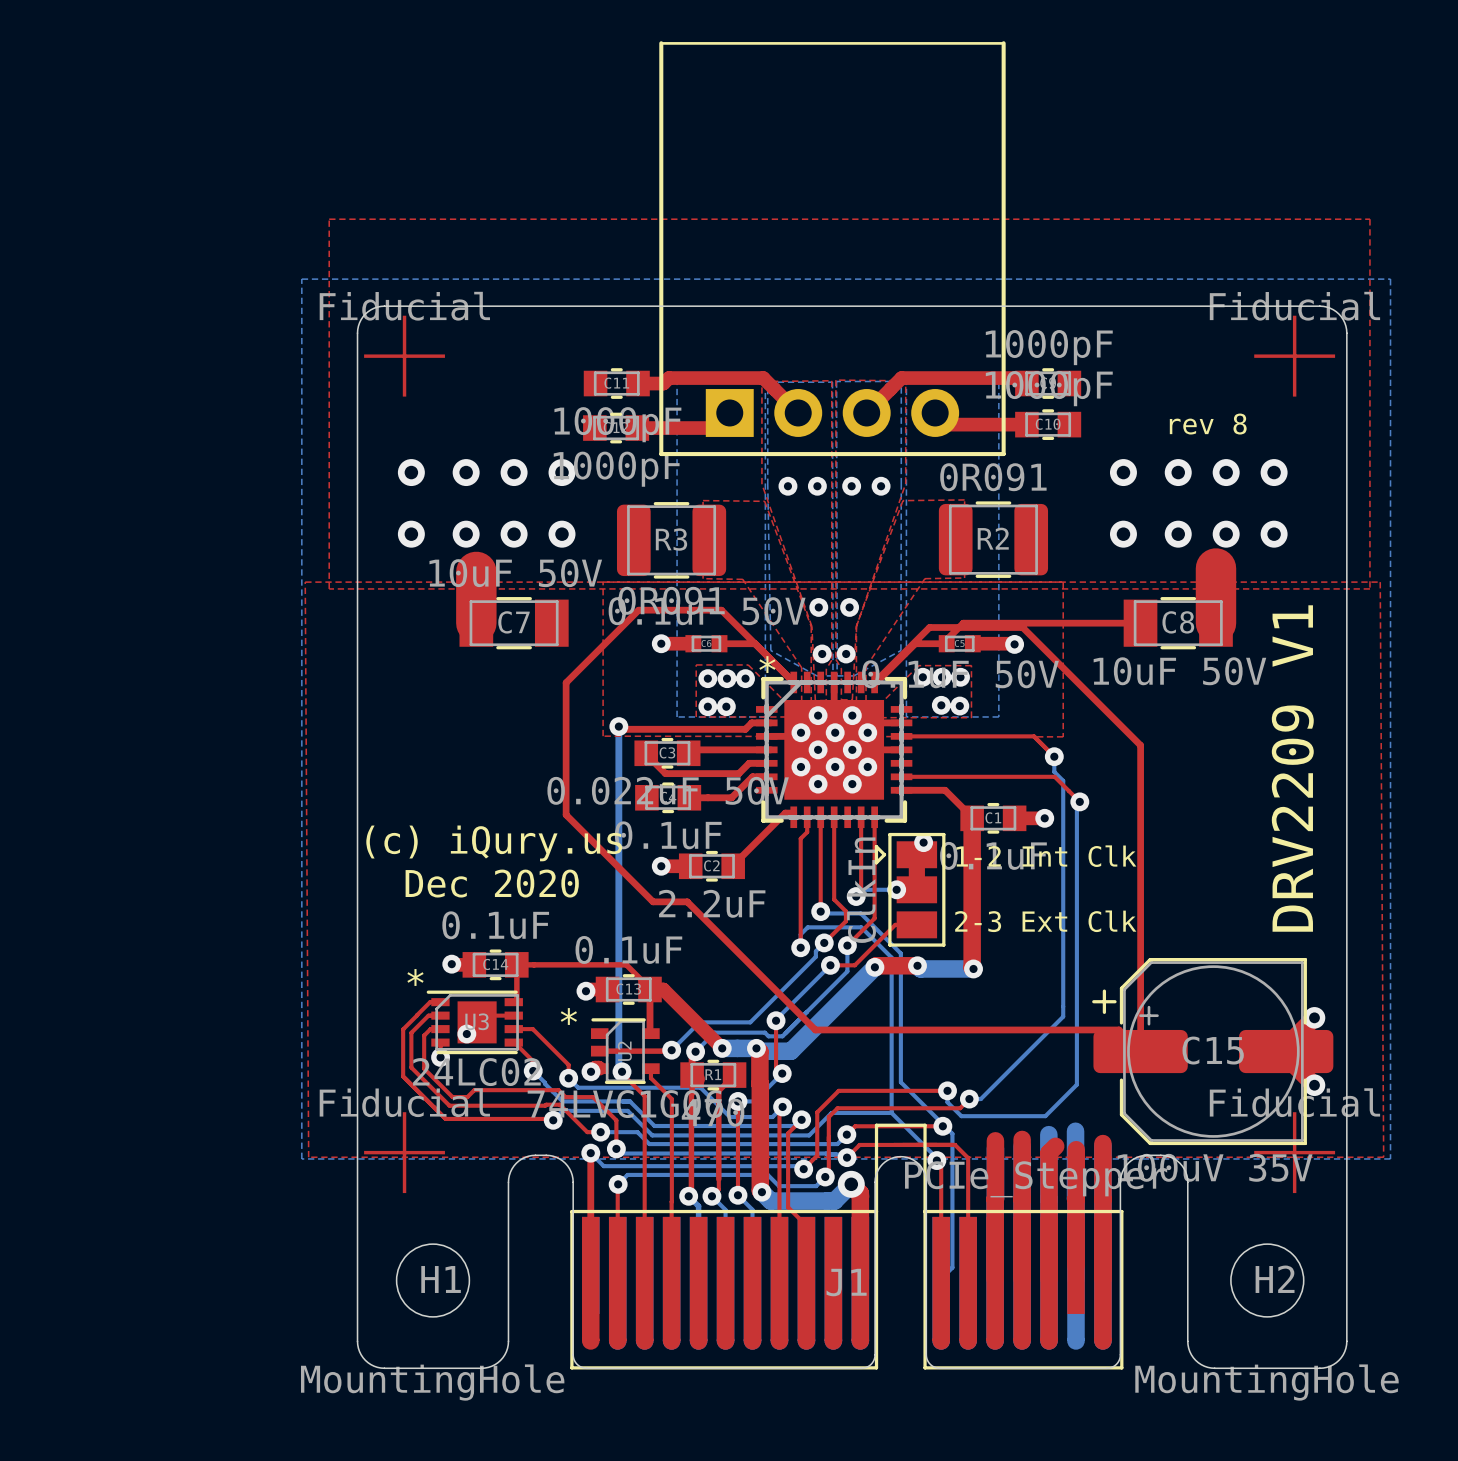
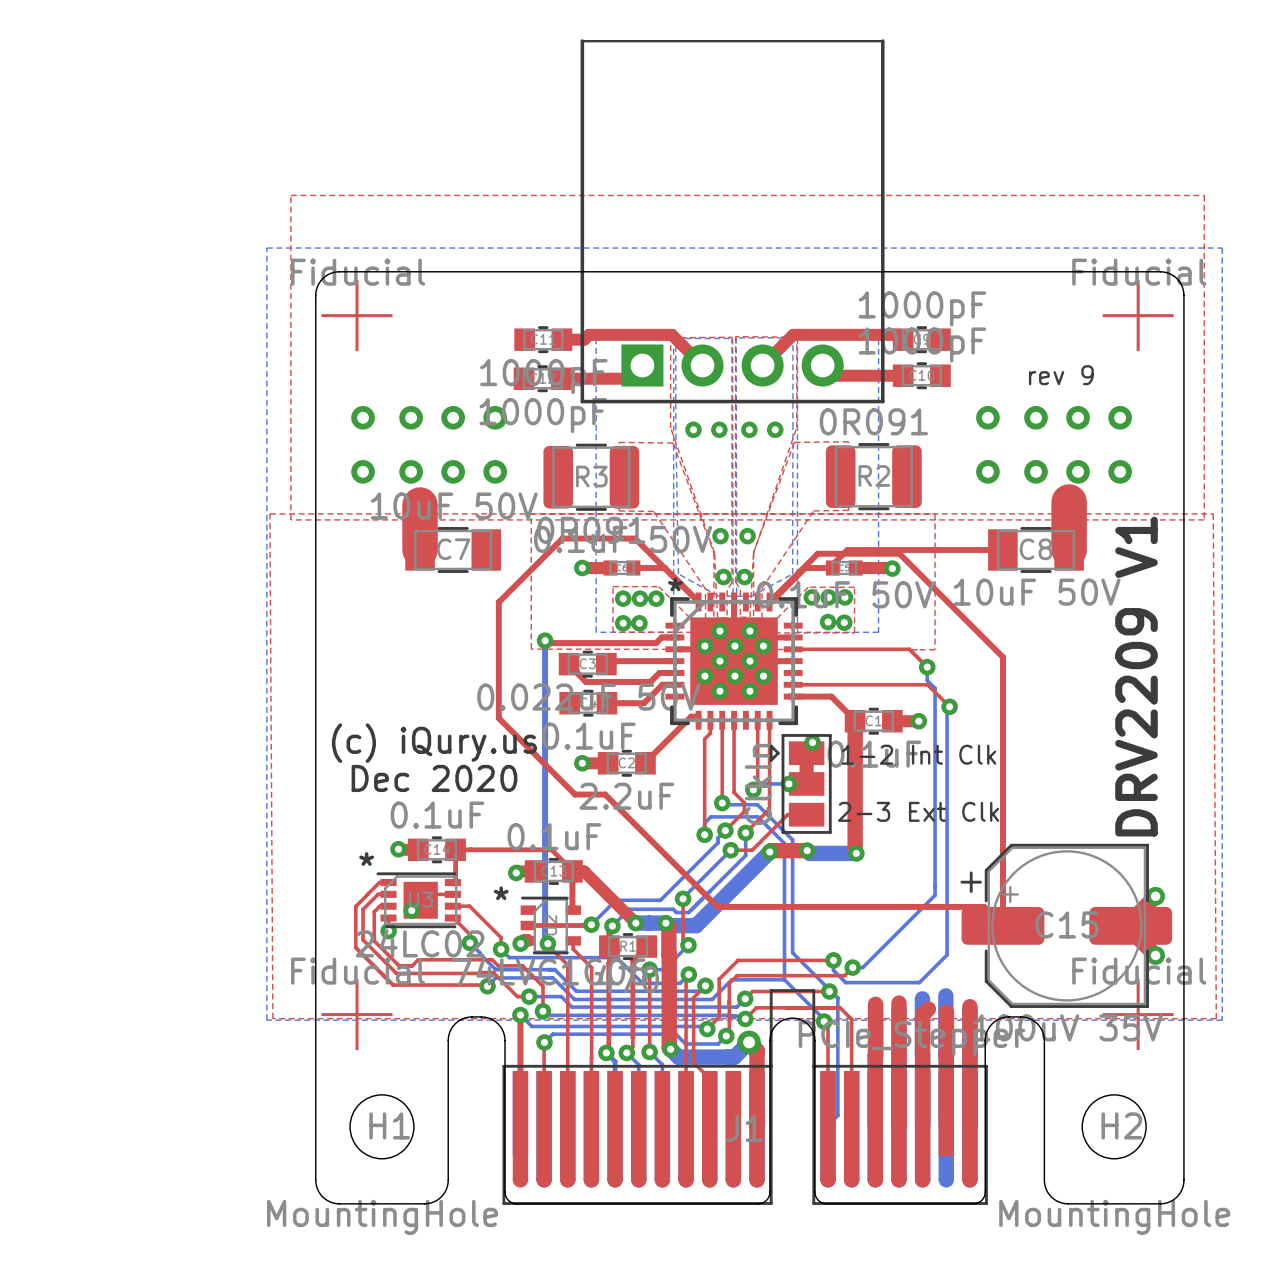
text: rev 8 (1208, 424) -> rev 9 (1061, 375)

